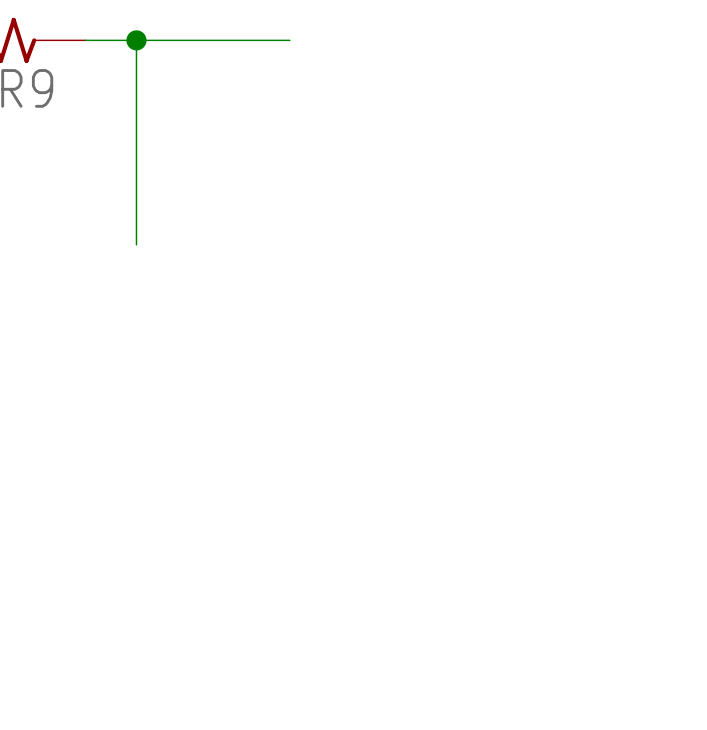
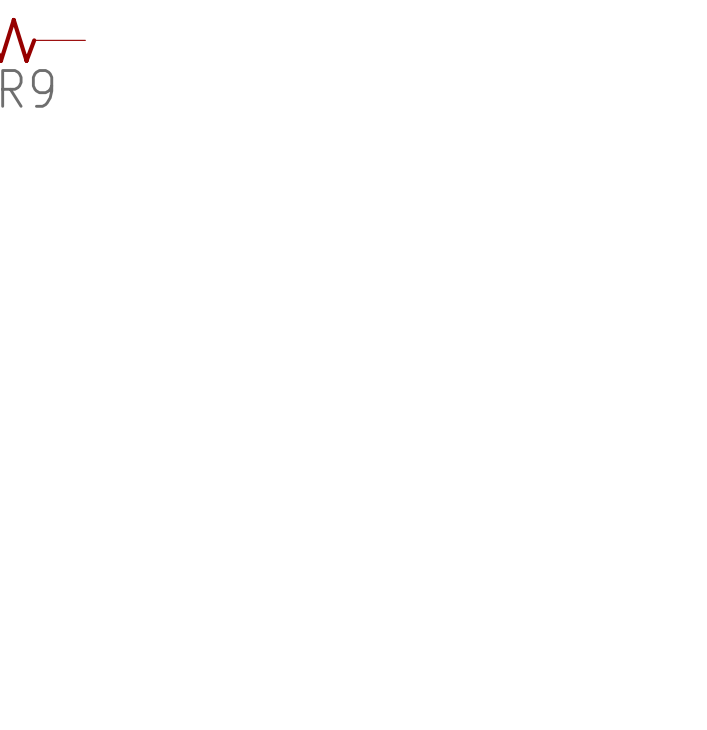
wire: (85, 40) (289, 40) -> none
wire: (136, 40) (136, 244) -> none
junction: (136, 40) -> none

